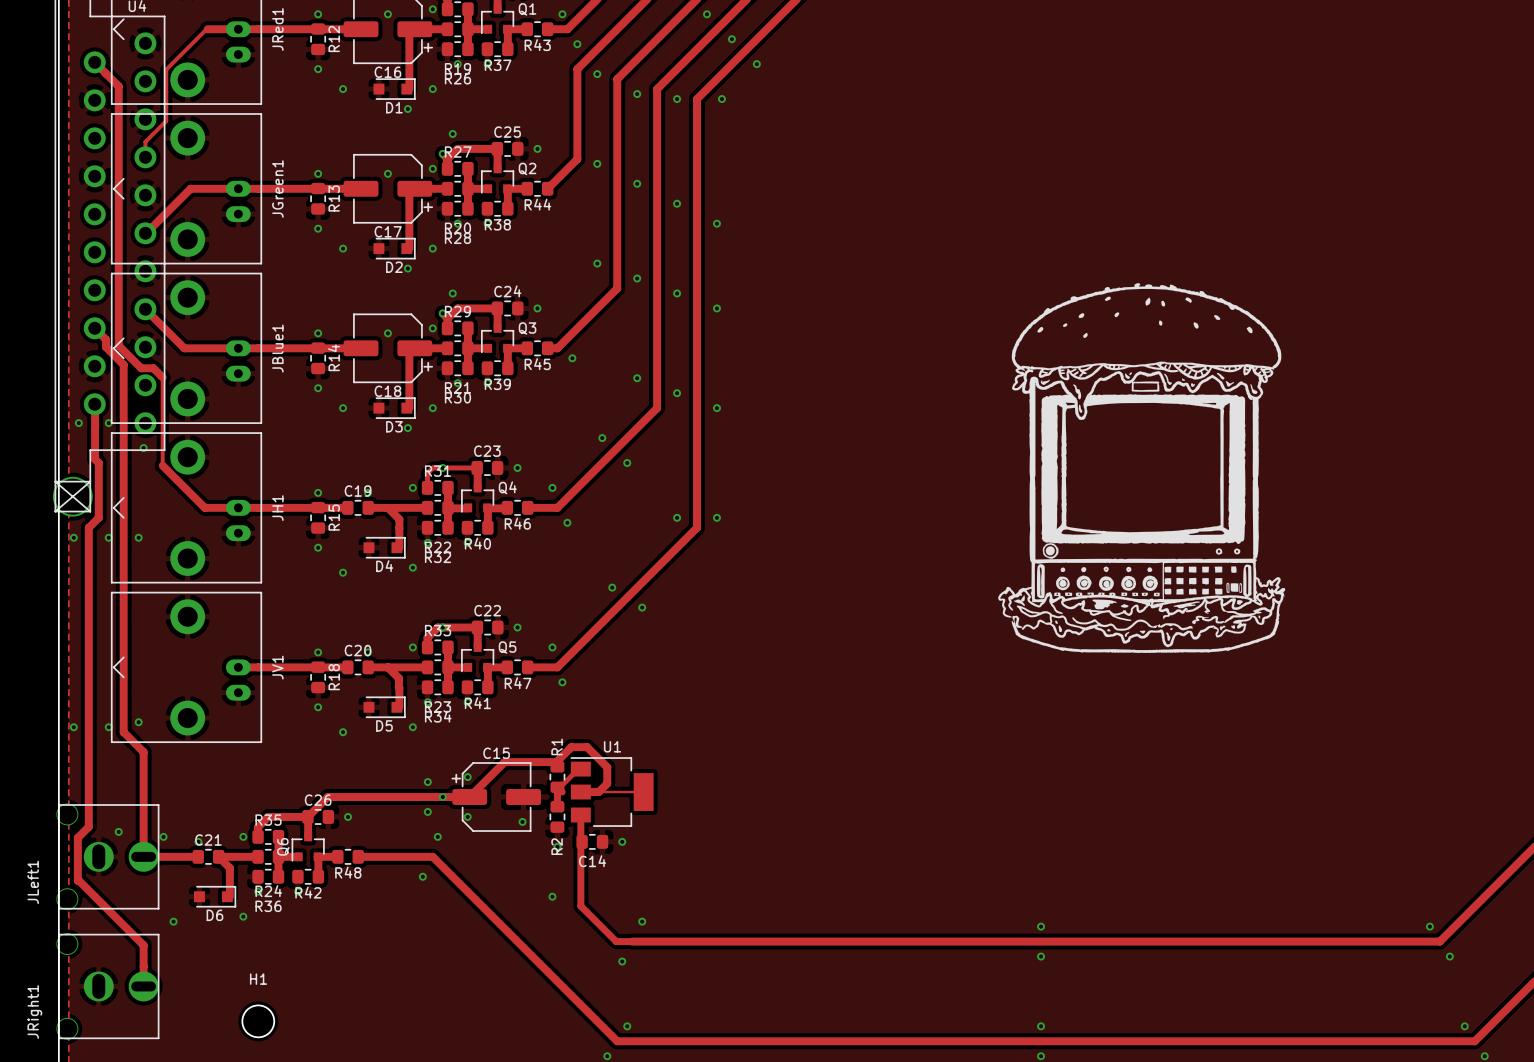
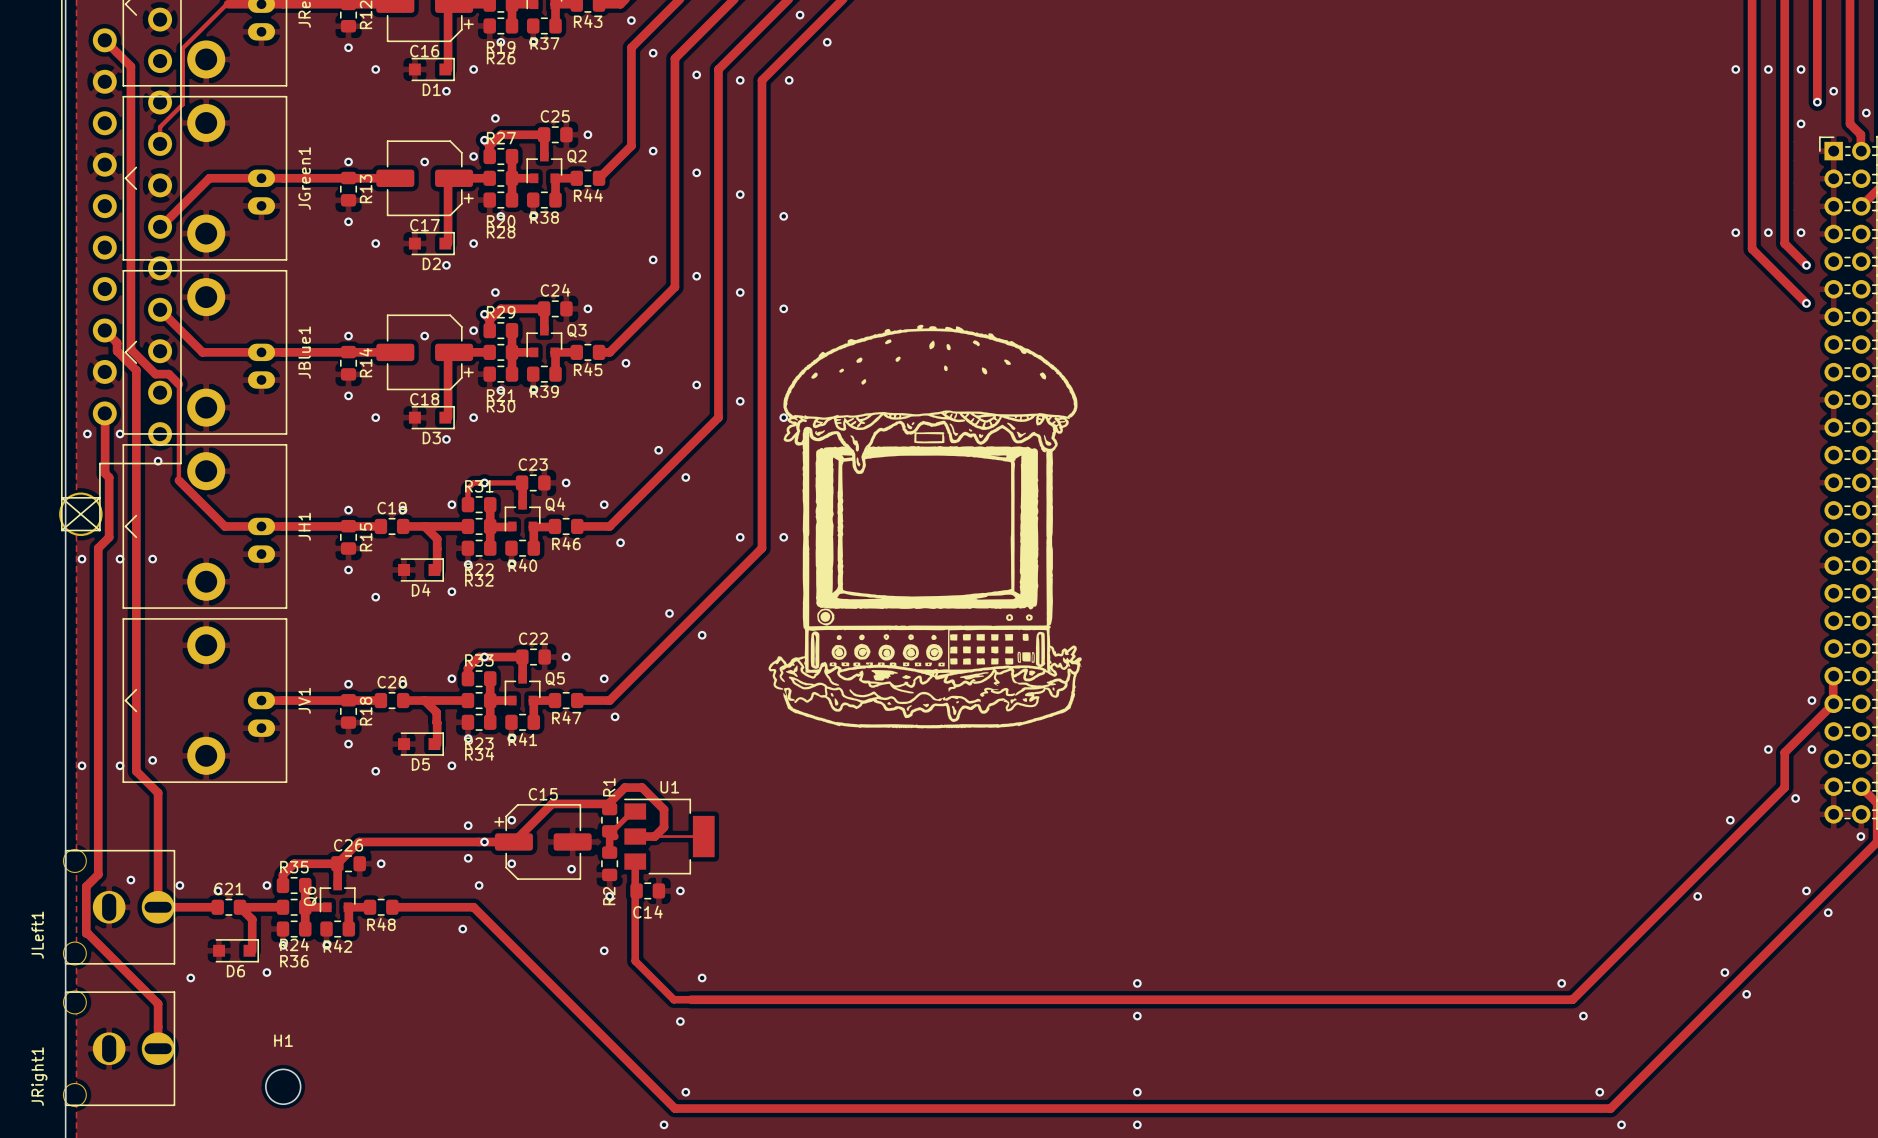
drawing: [998, 283, 1286, 654] -> none
drawing: none -> [768, 324, 1082, 729]

